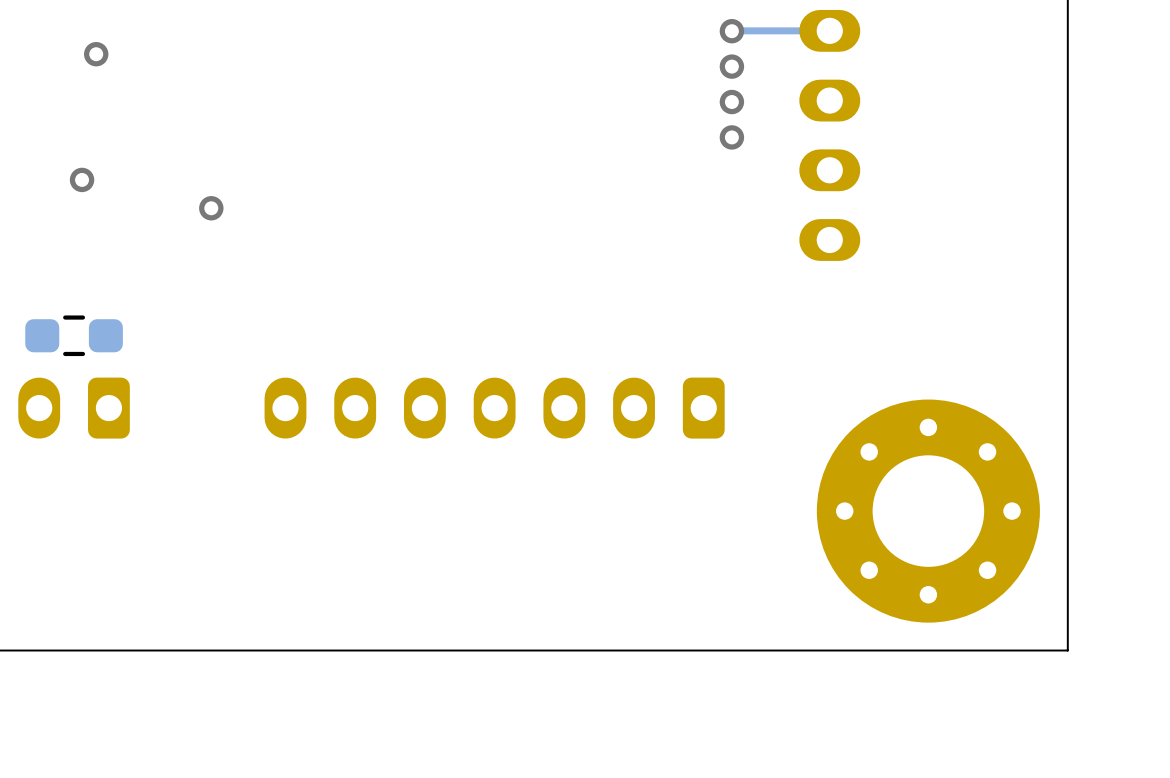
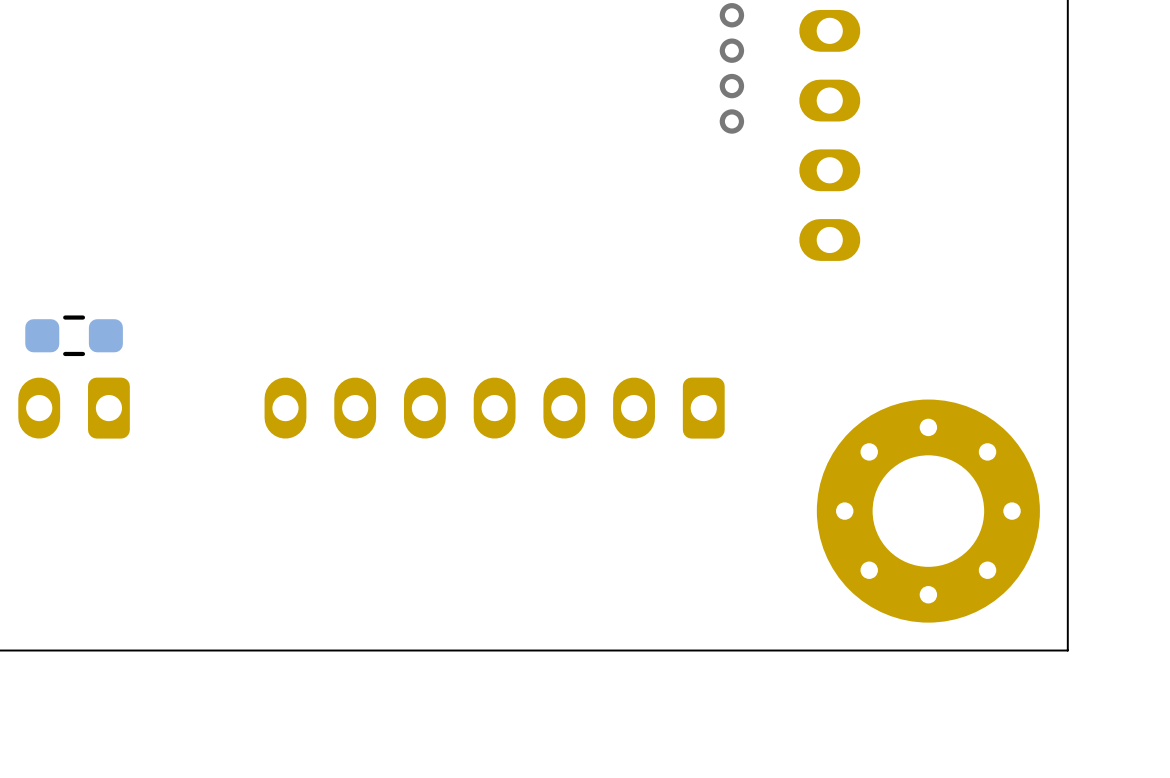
via: none -> (731, 15)
track: (829, 30) (732, 30) -> none
via: (731, 31) -> none
via: none -> (731, 50)
via: (96, 54) -> none
via: (731, 66) -> none
via: none -> (731, 86)
via: (731, 102) -> none
via: none -> (731, 121)
via: (731, 137) -> none
via: (82, 179) -> none
via: (211, 208) -> none

